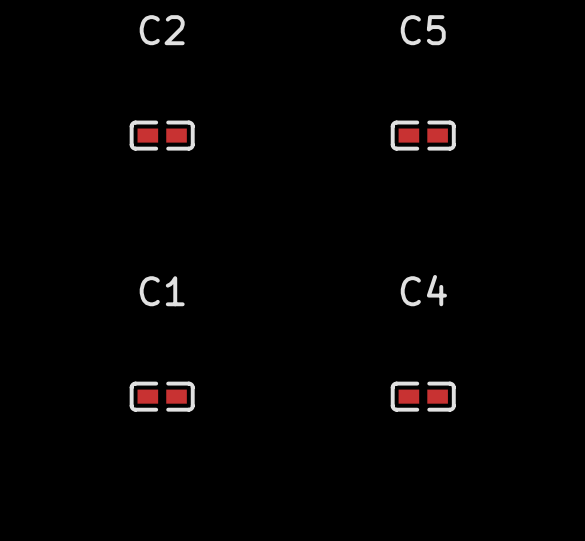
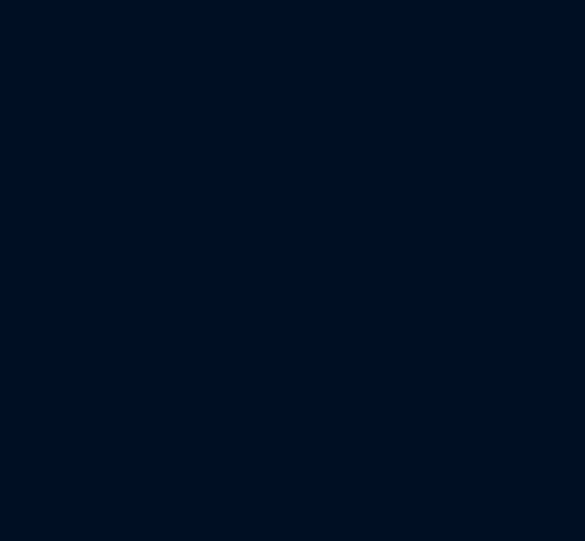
C2: (162, 135) -> none
C5: (423, 135) -> none
C1: (162, 396) -> none
C4: (423, 396) -> none

